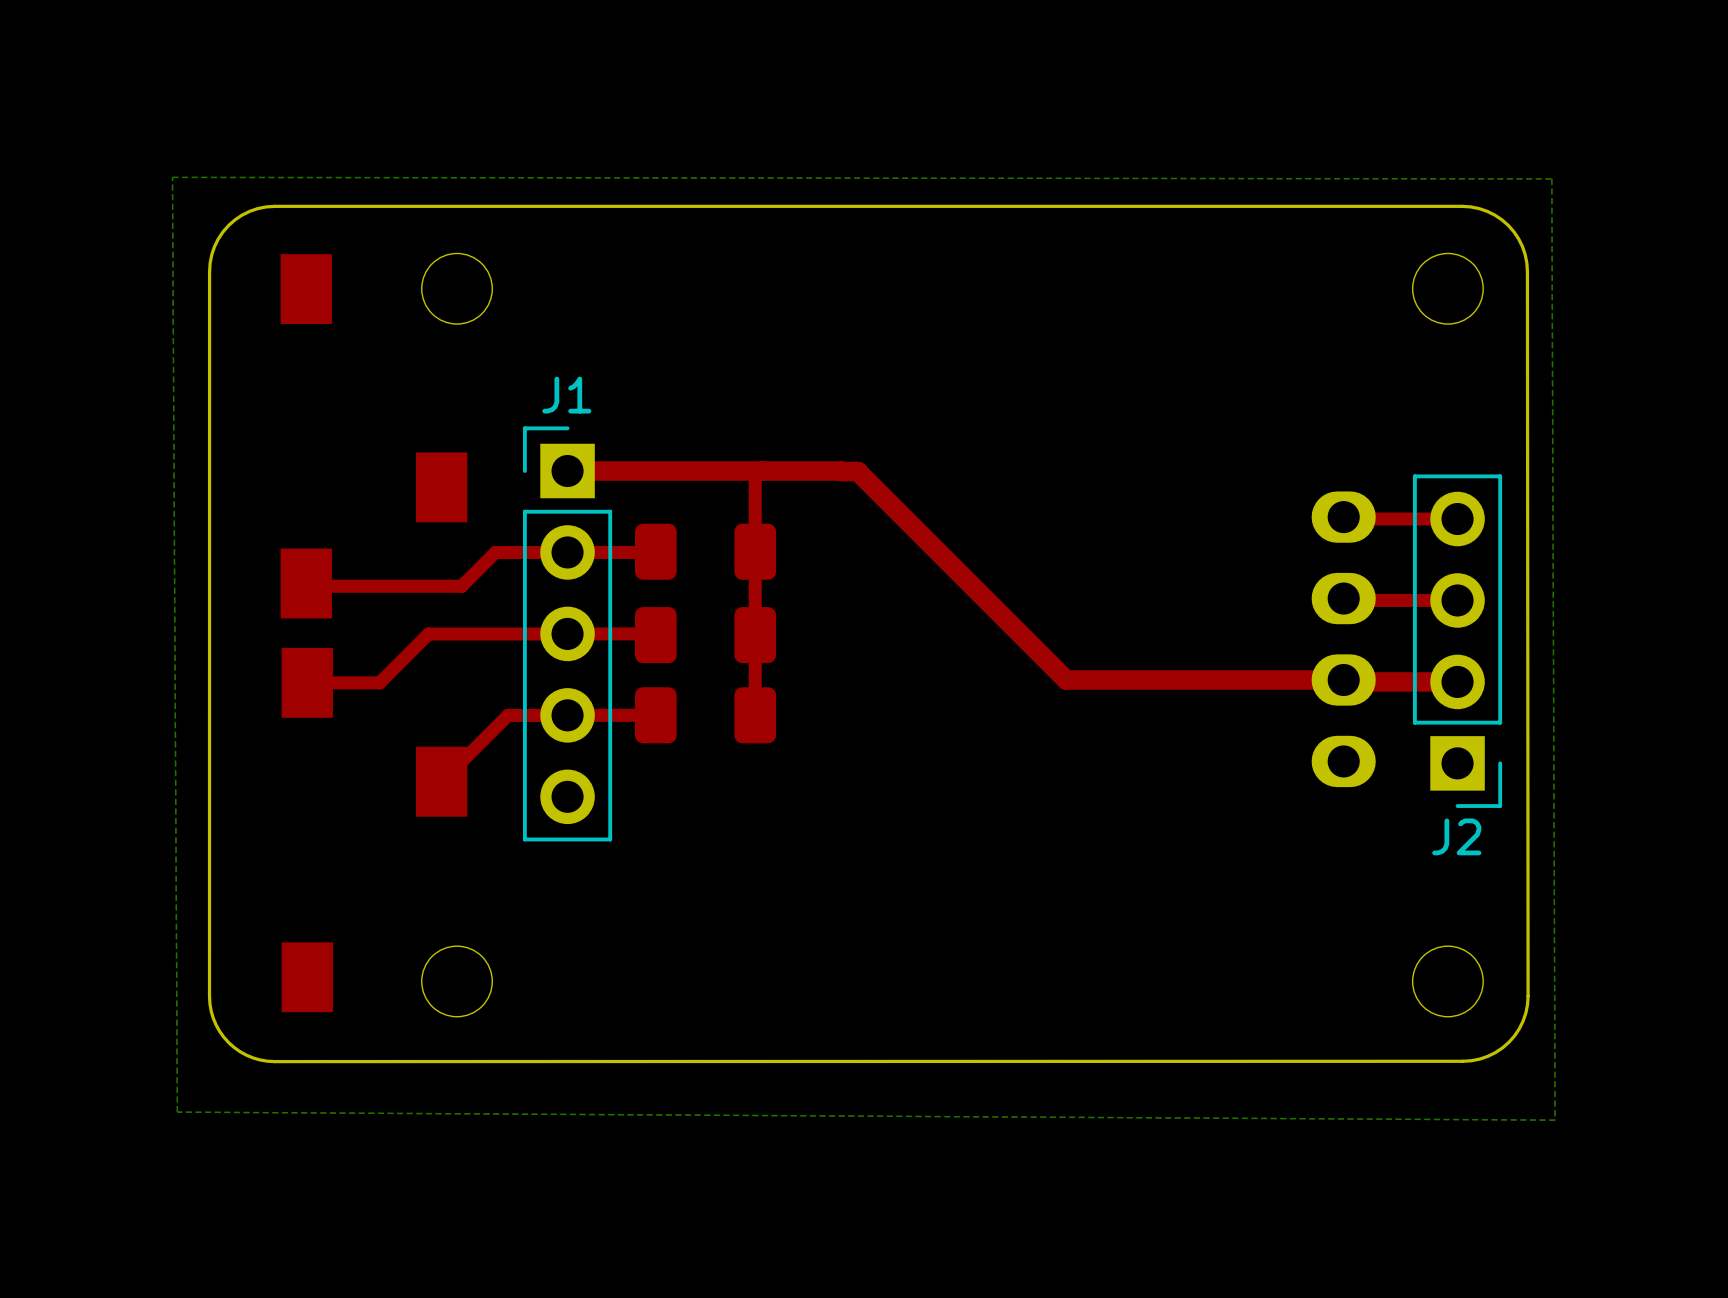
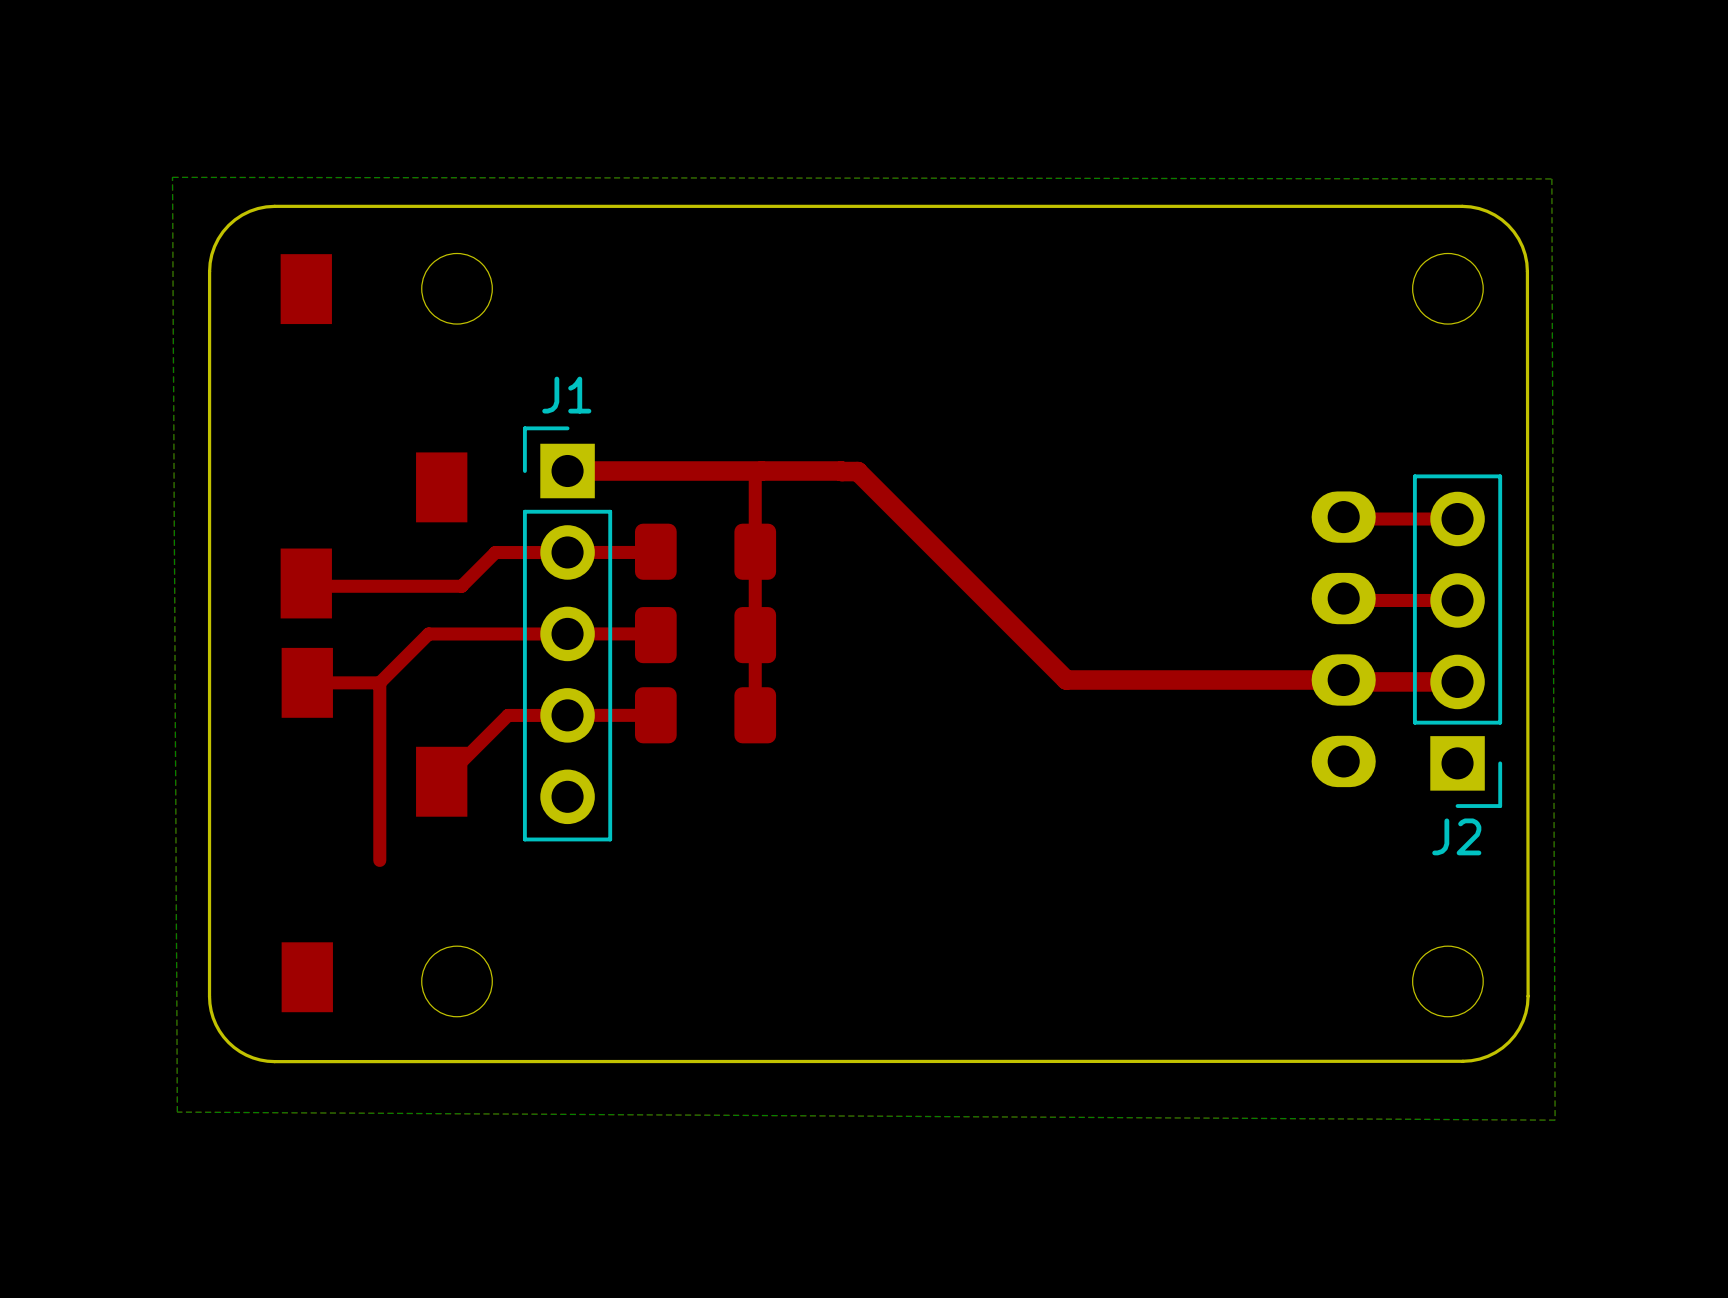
top track: none -> (379, 682) (379, 860)

